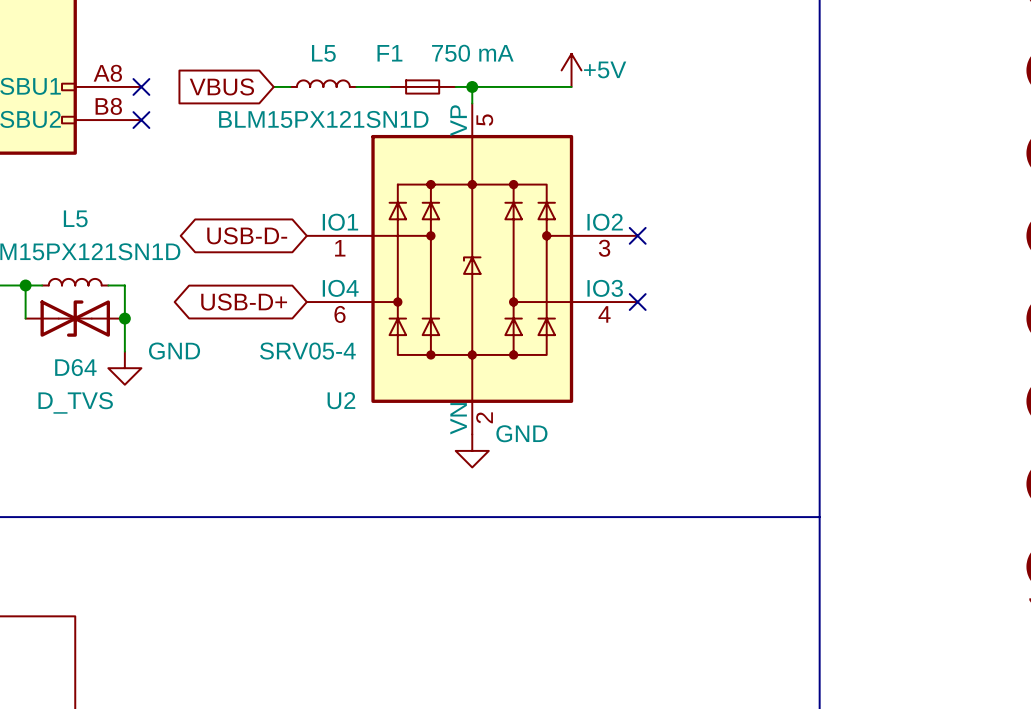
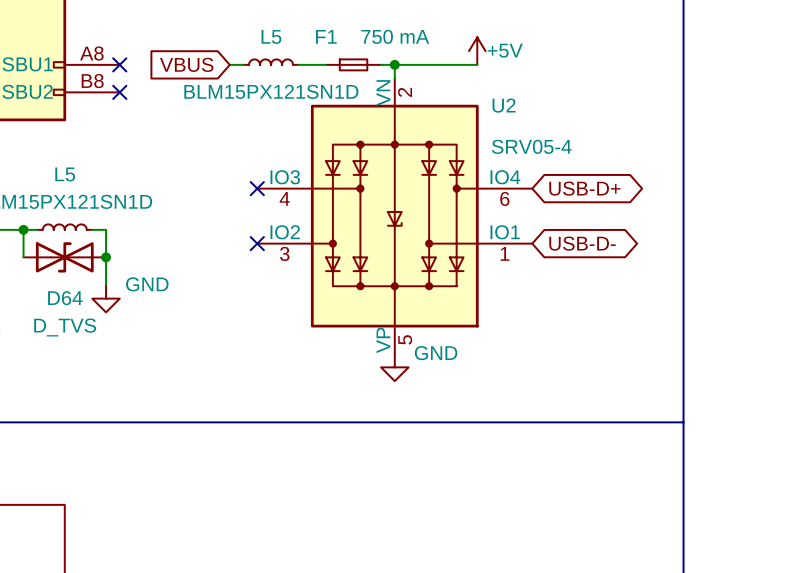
global label: USB-D- (247, 235) -> none
no-connect mark: none -> (257, 188)
no-connect mark: (637, 235) -> none
global label: none -> USB-D+ (584, 188)
U2 rotation: 0° (472, 268) -> 180° (394, 216)
global label: USB-D+ (244, 302) -> none
no-connect mark: none -> (257, 243)
no-connect mark: (637, 302) -> none
global label: none -> USB-D- (582, 243)

